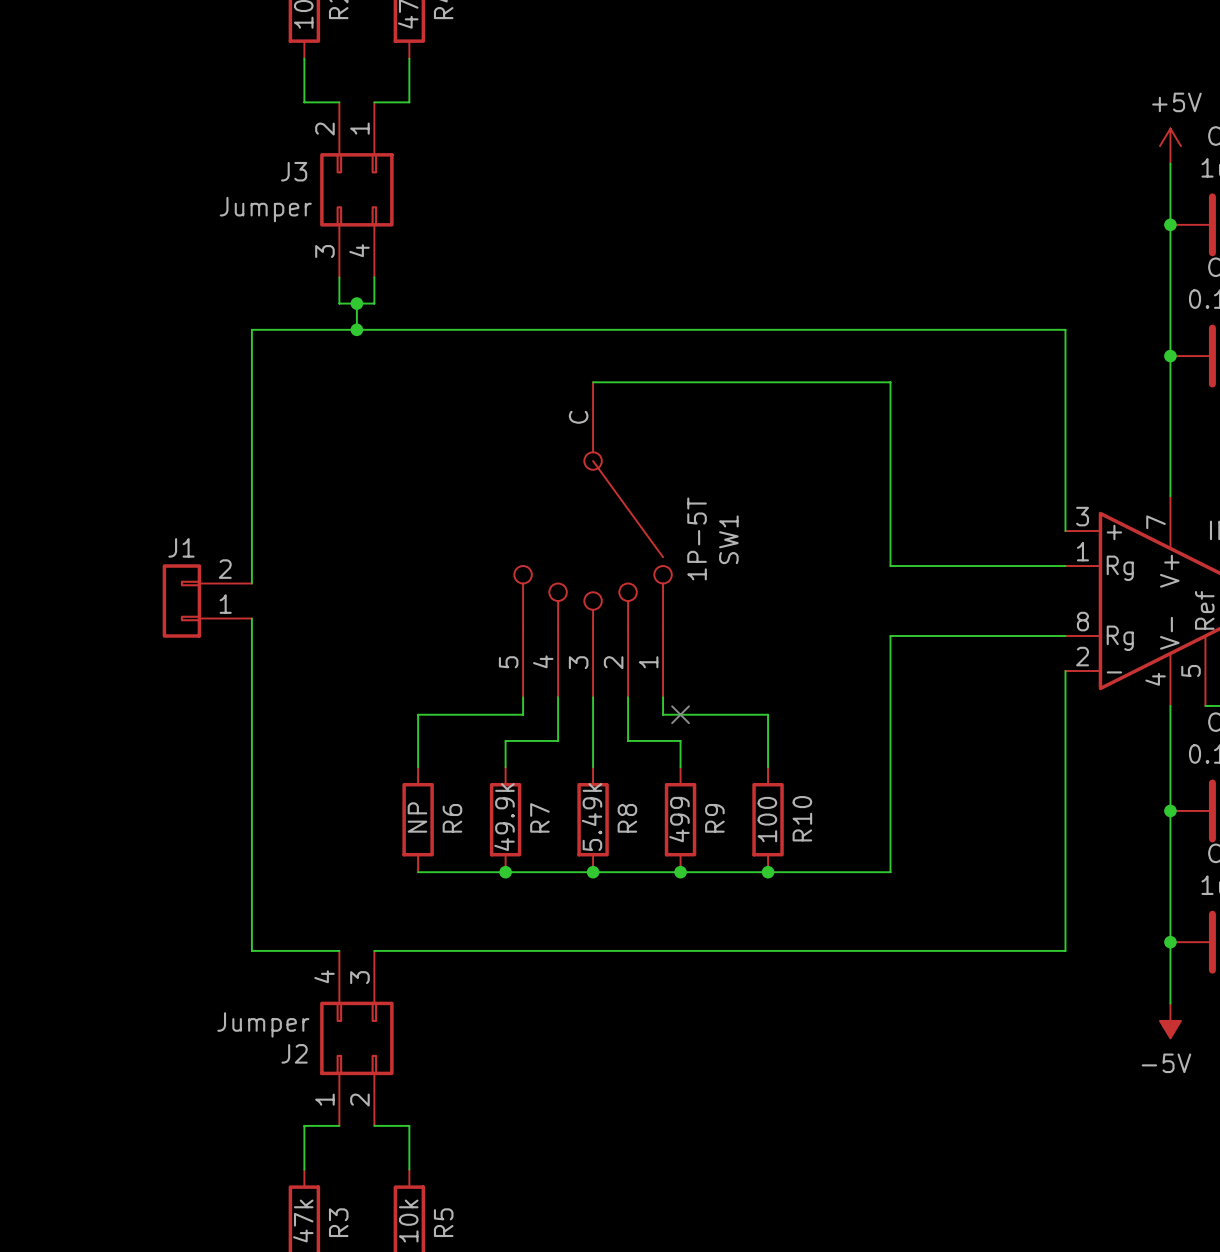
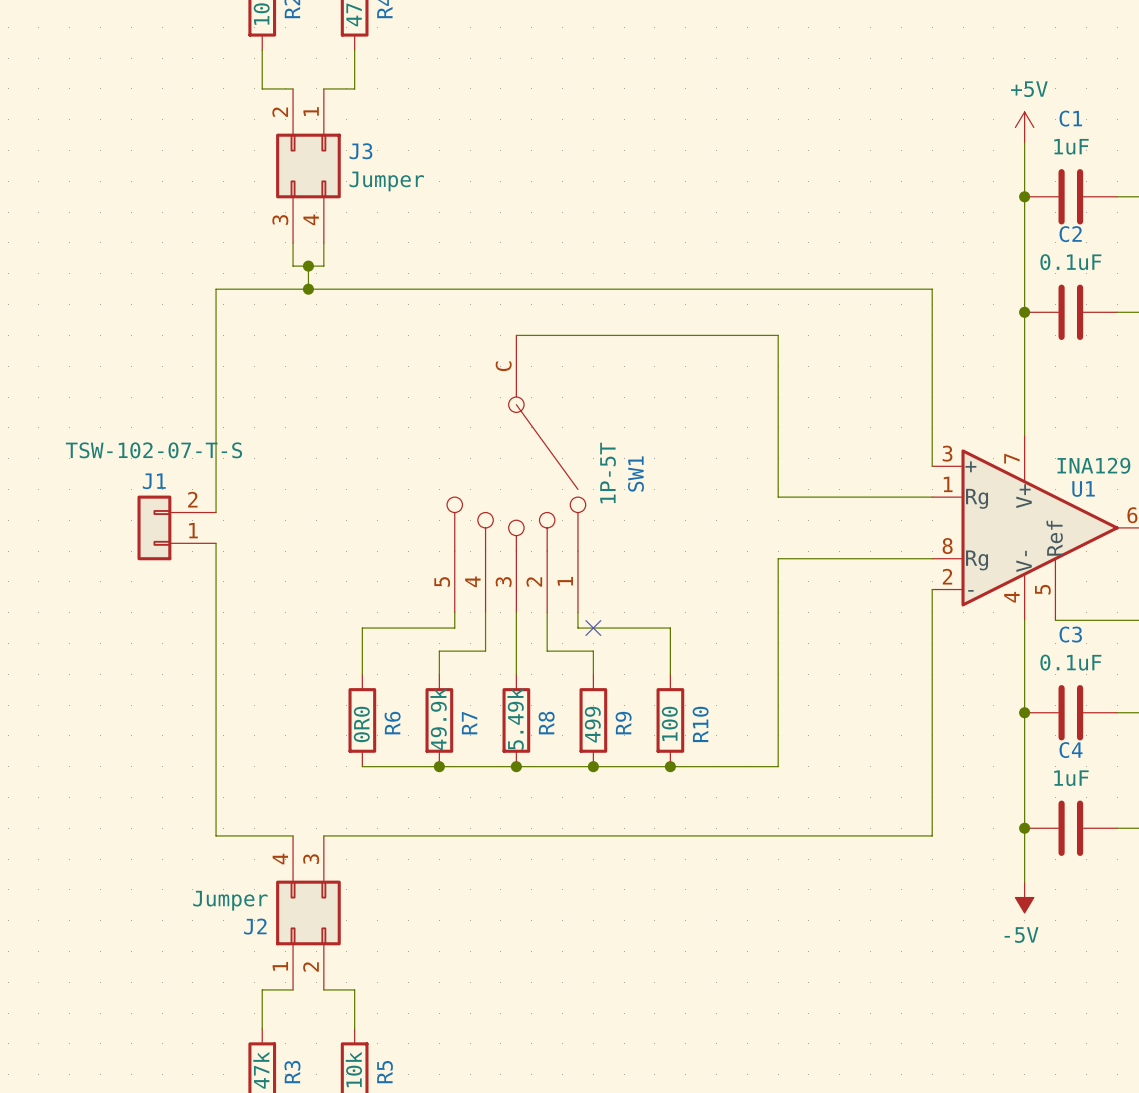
J3 name position: J3 (294, 171) -> J3 (360, 151)
J3 value position: Jumper (265, 209) -> Jumper (386, 181)
J1 text: none -> TSW-102-07-T-S (153, 450)
R6 text: NP (417, 817) -> 0R0 (361, 724)

